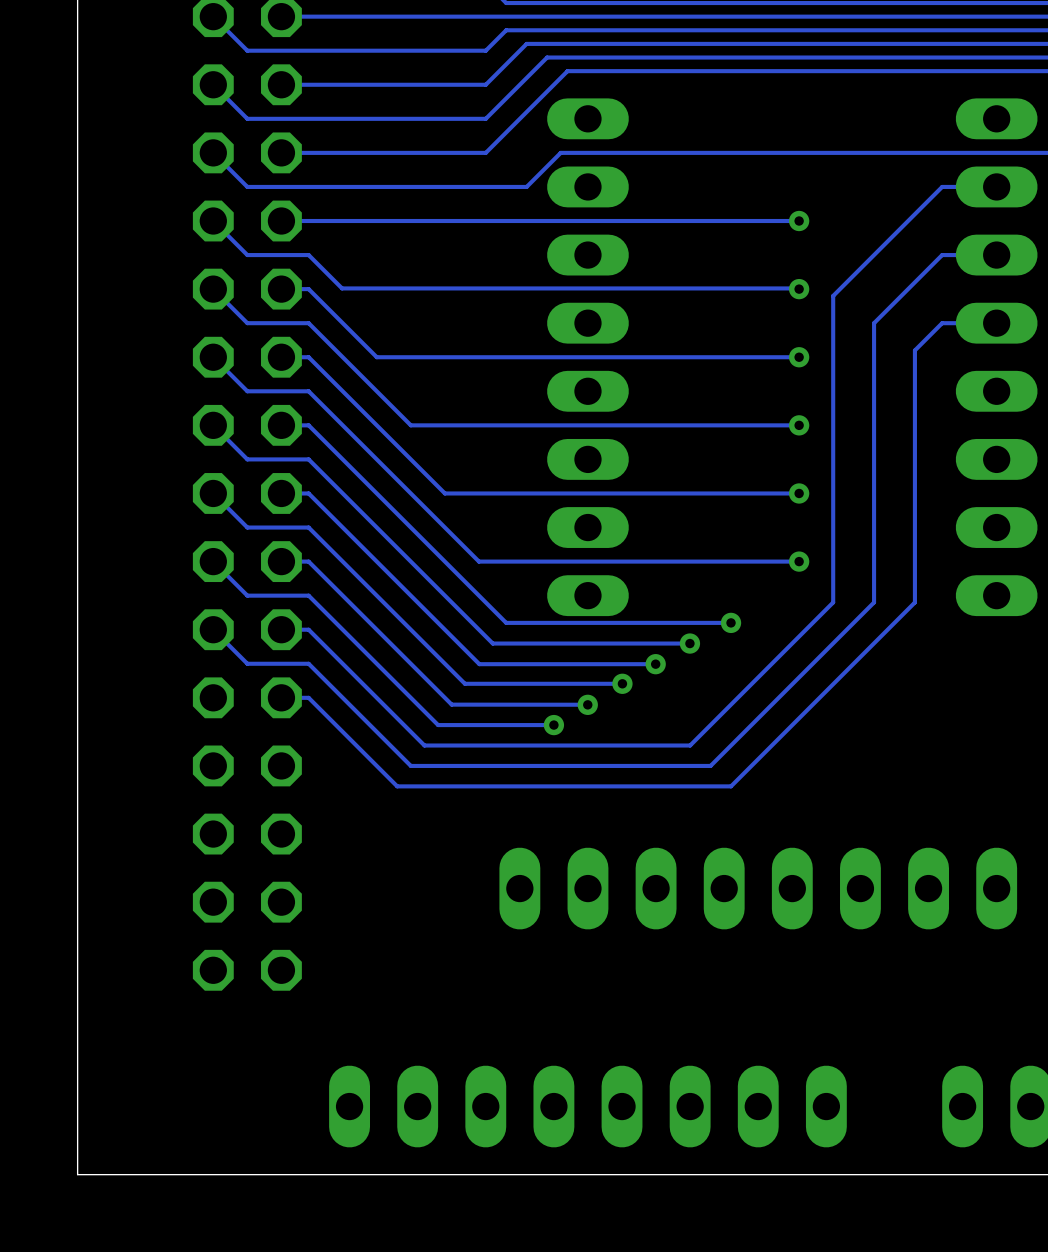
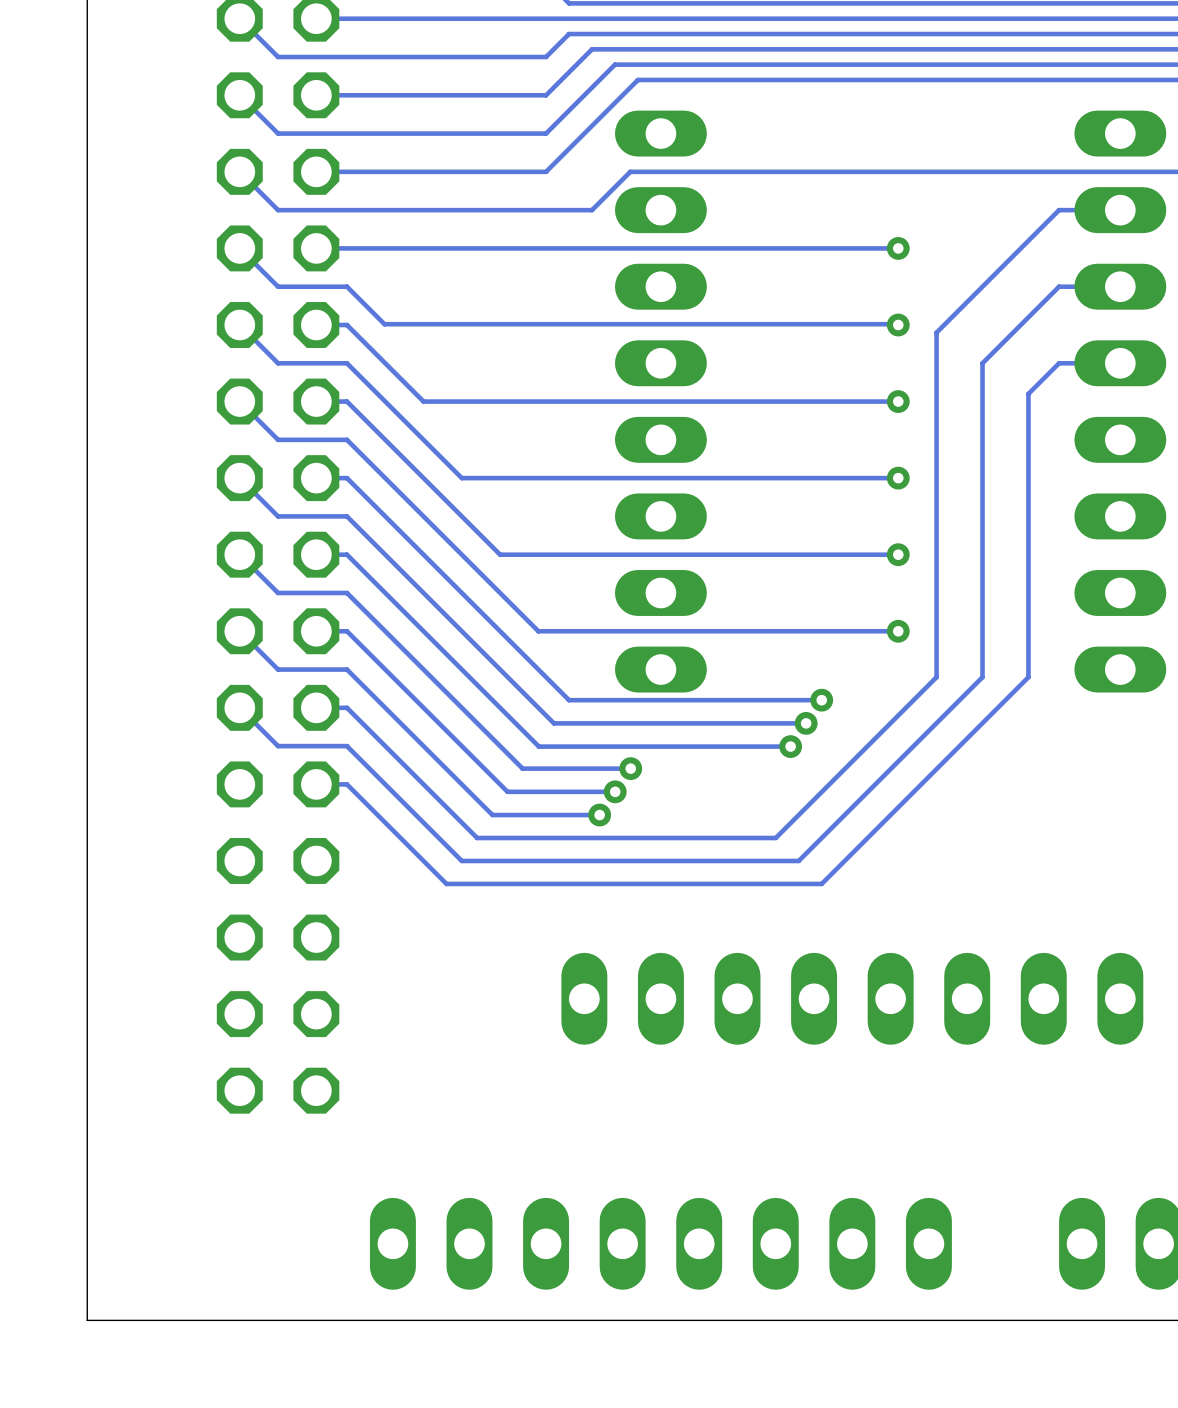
via: (689, 643) -> none
track: none -> (806, 723) (775, 723)
via: none -> (806, 723)
via: (655, 664) -> none
track: none -> (790, 746) (737, 746)
via: none -> (790, 746)
via: none -> (630, 768)
track: (622, 683) (561, 683) -> none
via: (622, 683) -> none
track: (451, 704) (587, 704) -> (507, 791) (615, 791)
via: none -> (615, 791)
via: (587, 704) -> none
via: none -> (599, 815)
track: (553, 725) (533, 725) -> none
via: (553, 725) -> none

